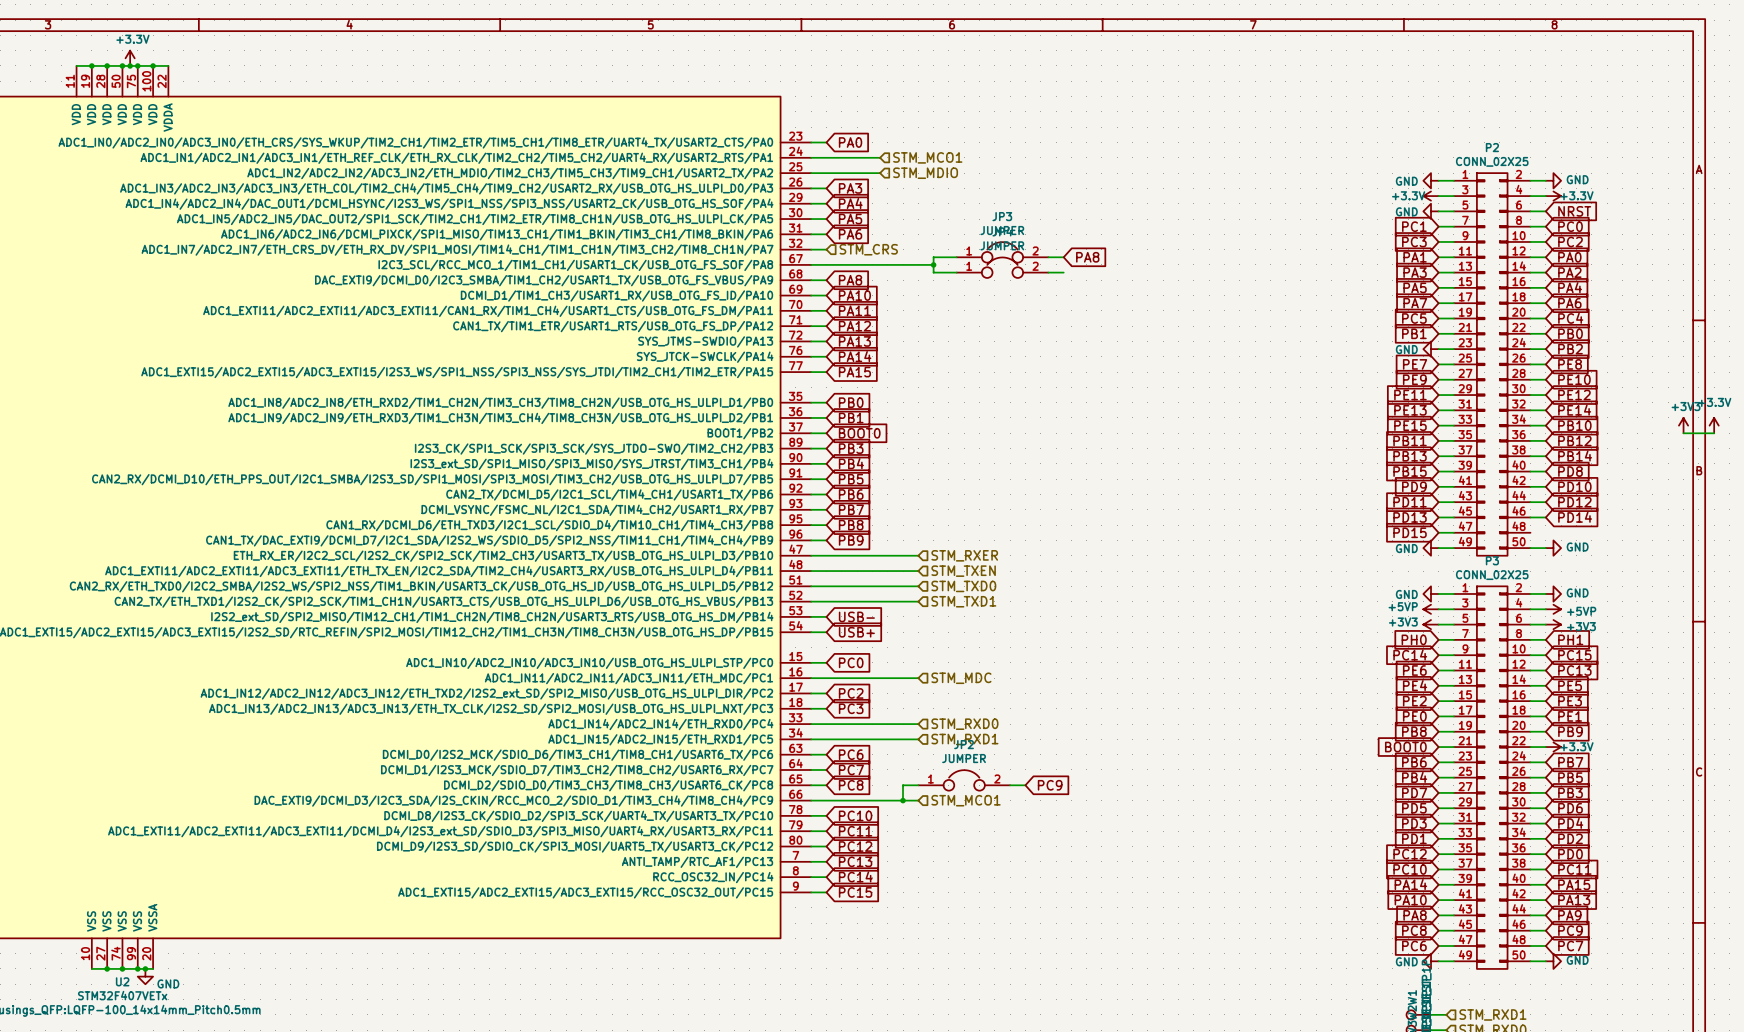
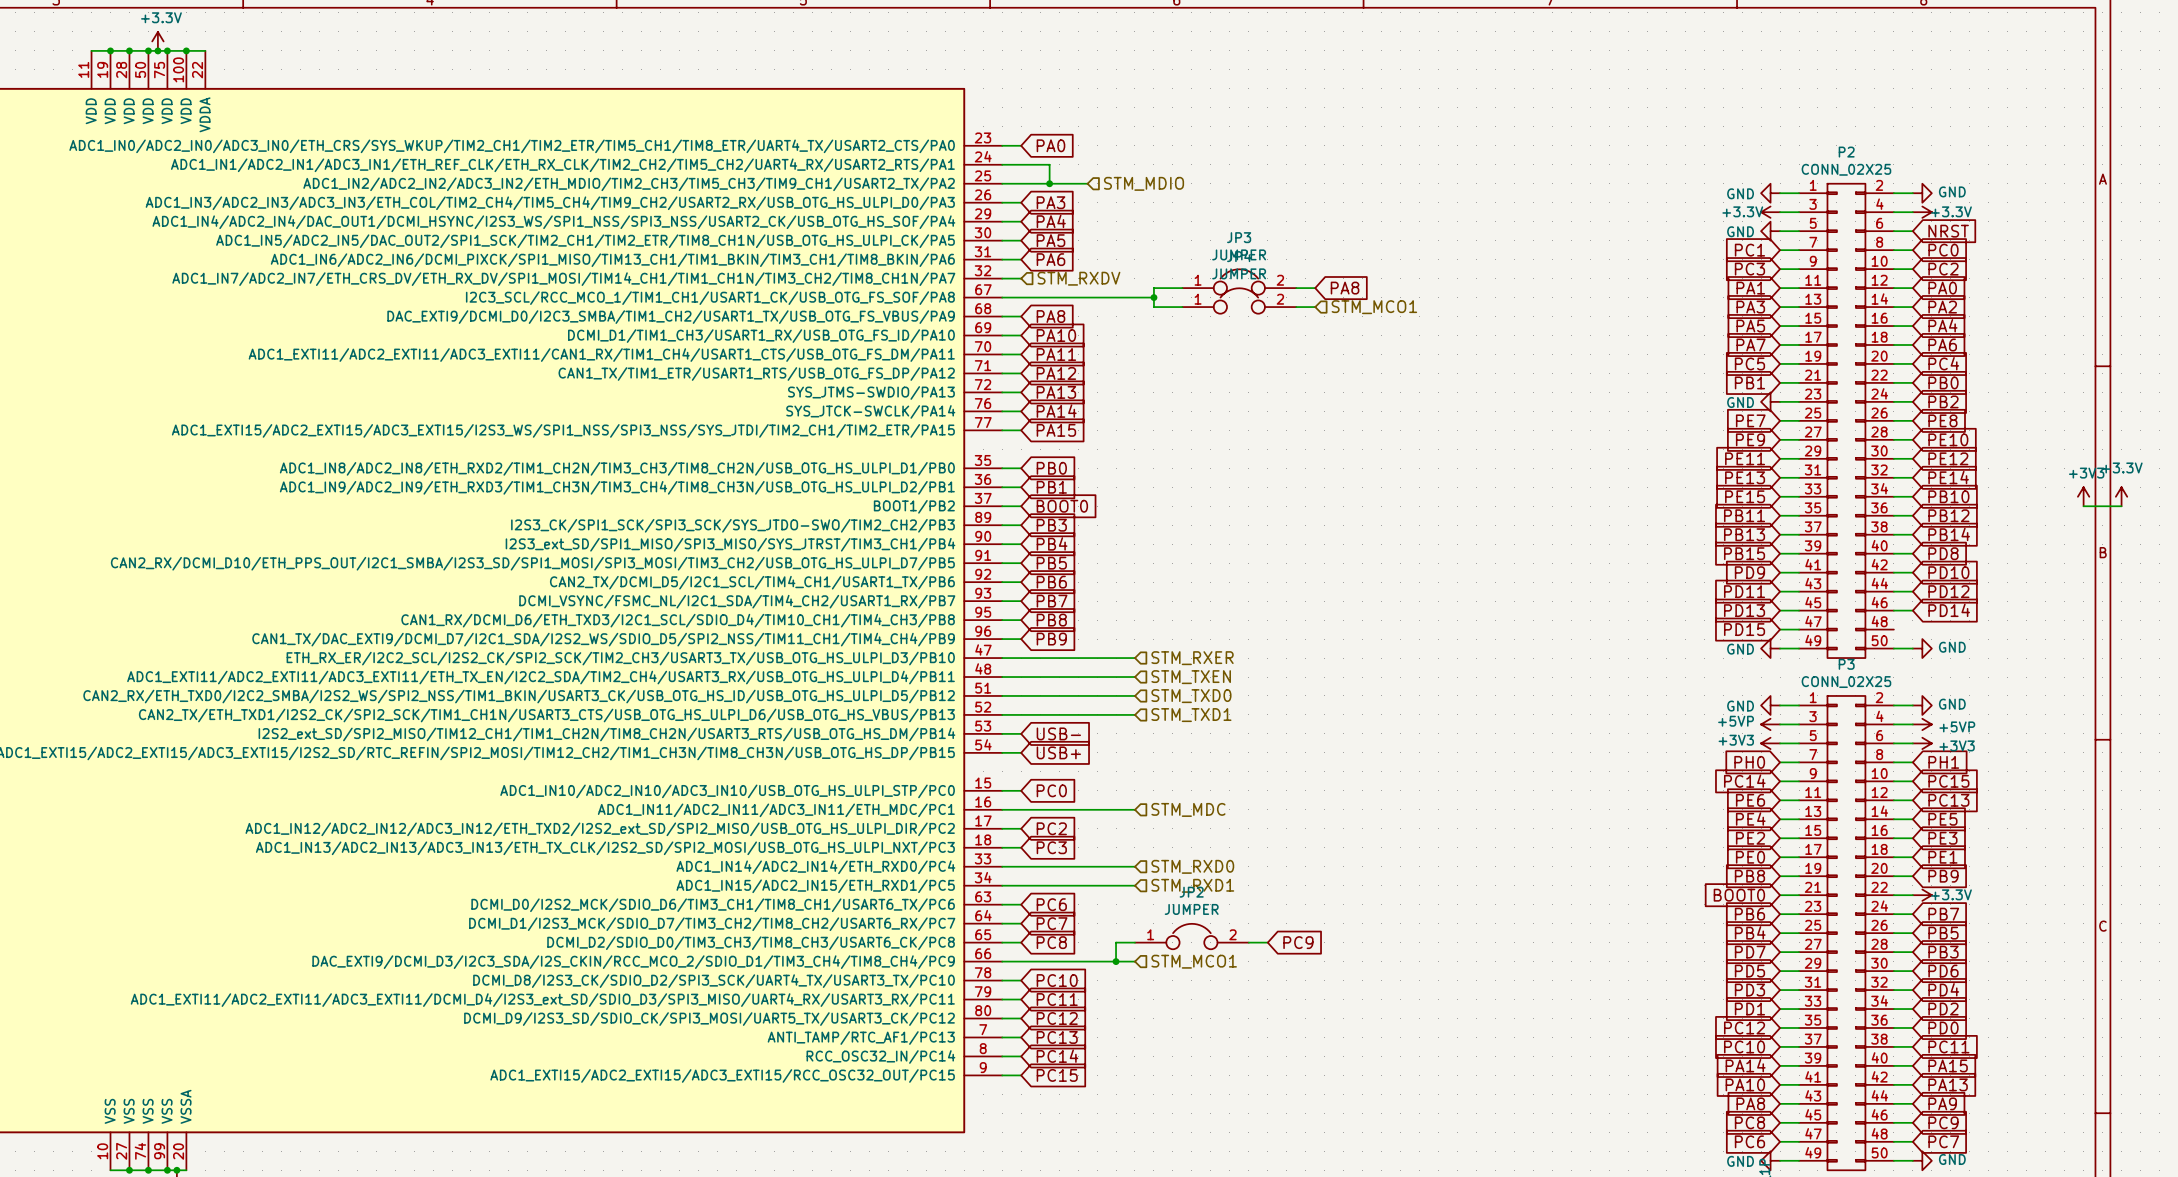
wire: (849, 157) (880, 157) -> (1049, 164) (1049, 183)
hierarchical label: STM_MCO1 (927, 157) -> none
junction: none -> (1049, 183)
hierarchical label: STM_CRS (868, 249) -> STM_RXDV (1078, 278)
hierarchical label: none -> STM_MCO1 (1374, 307)

